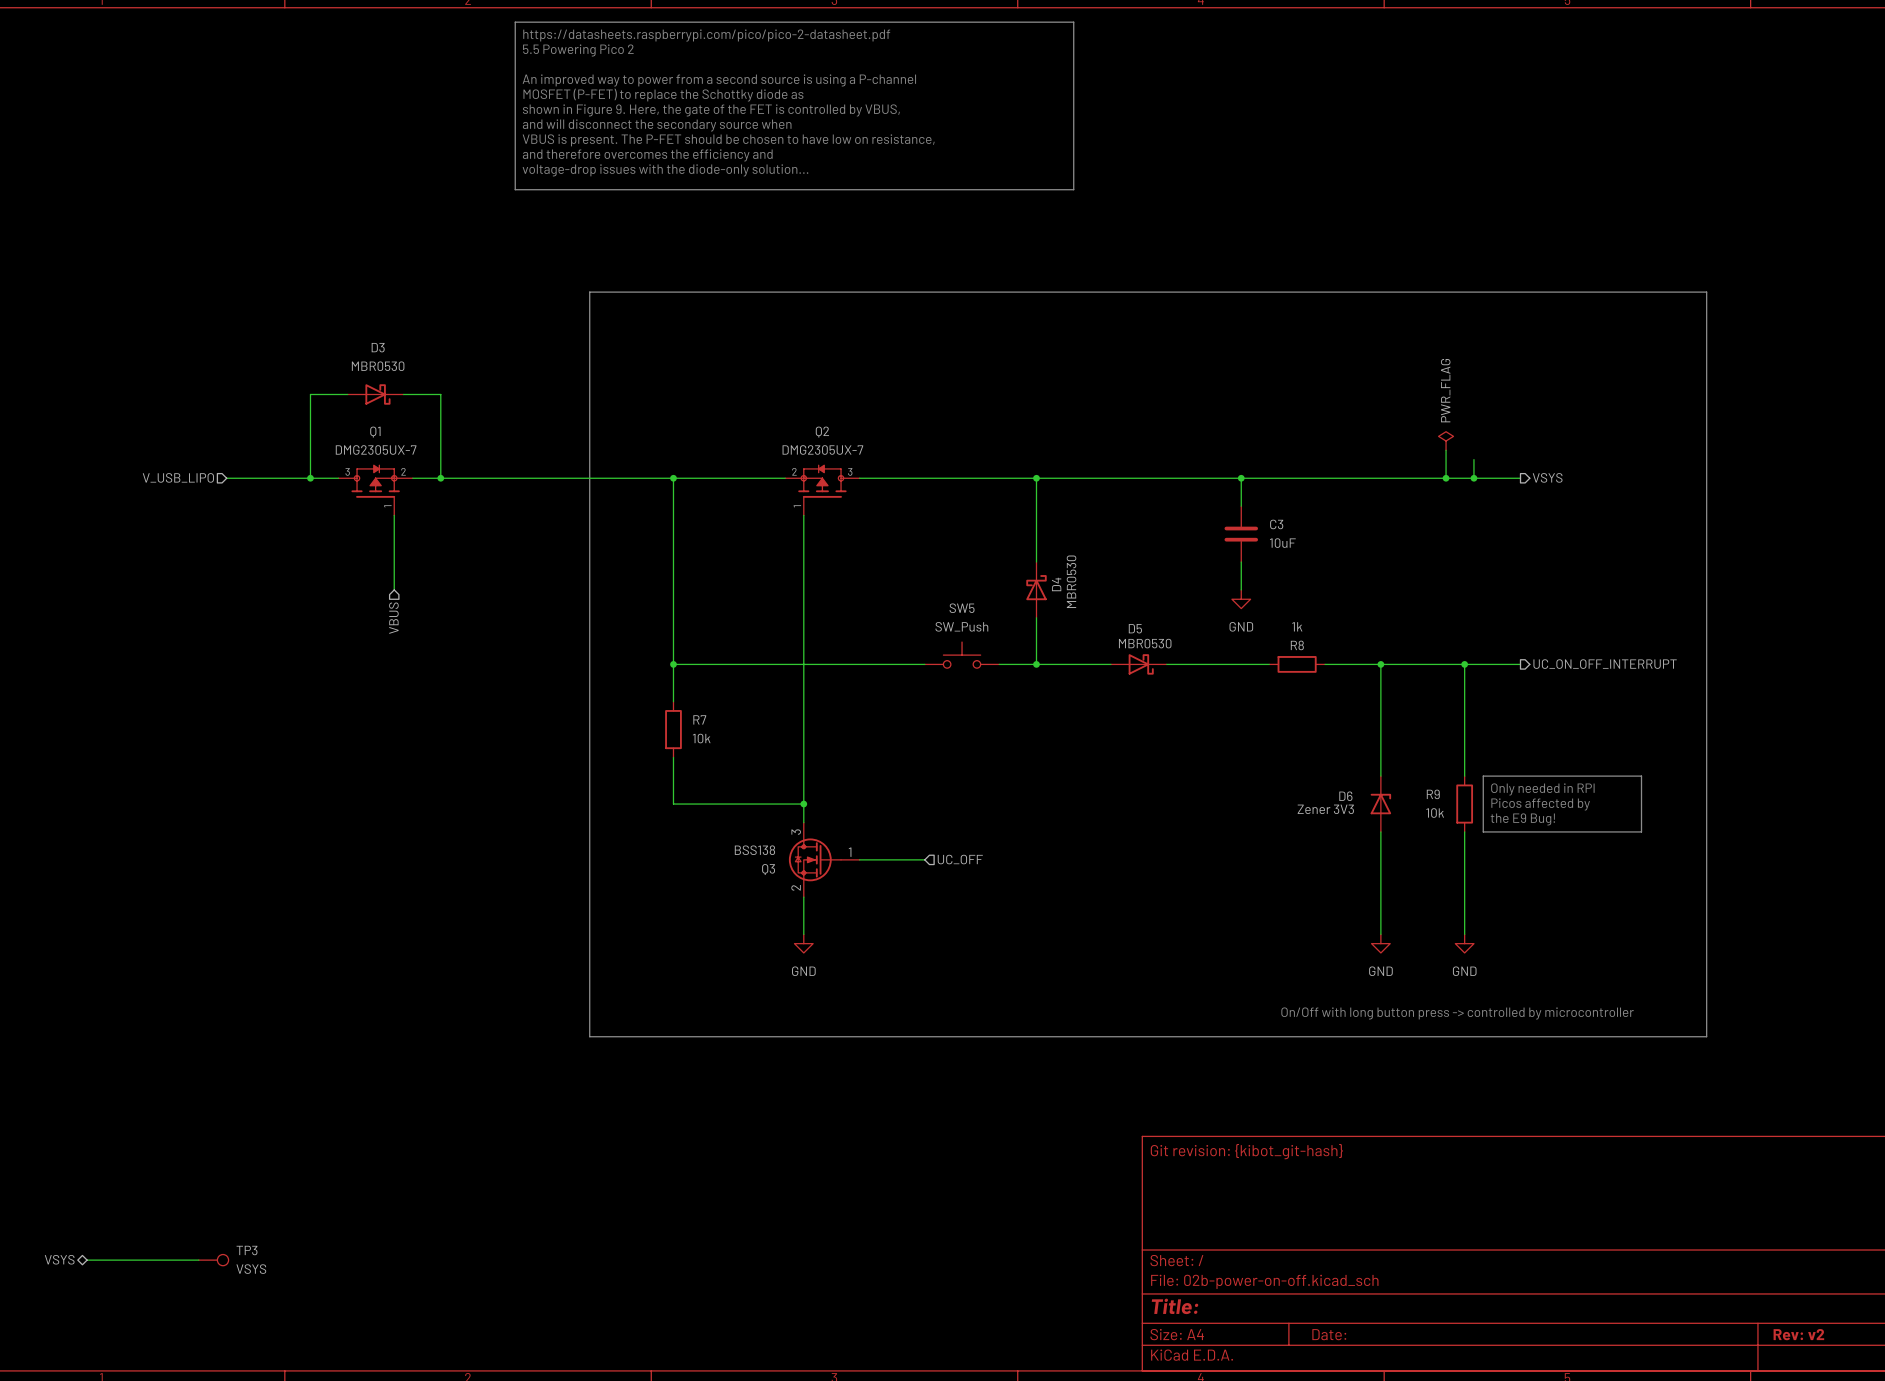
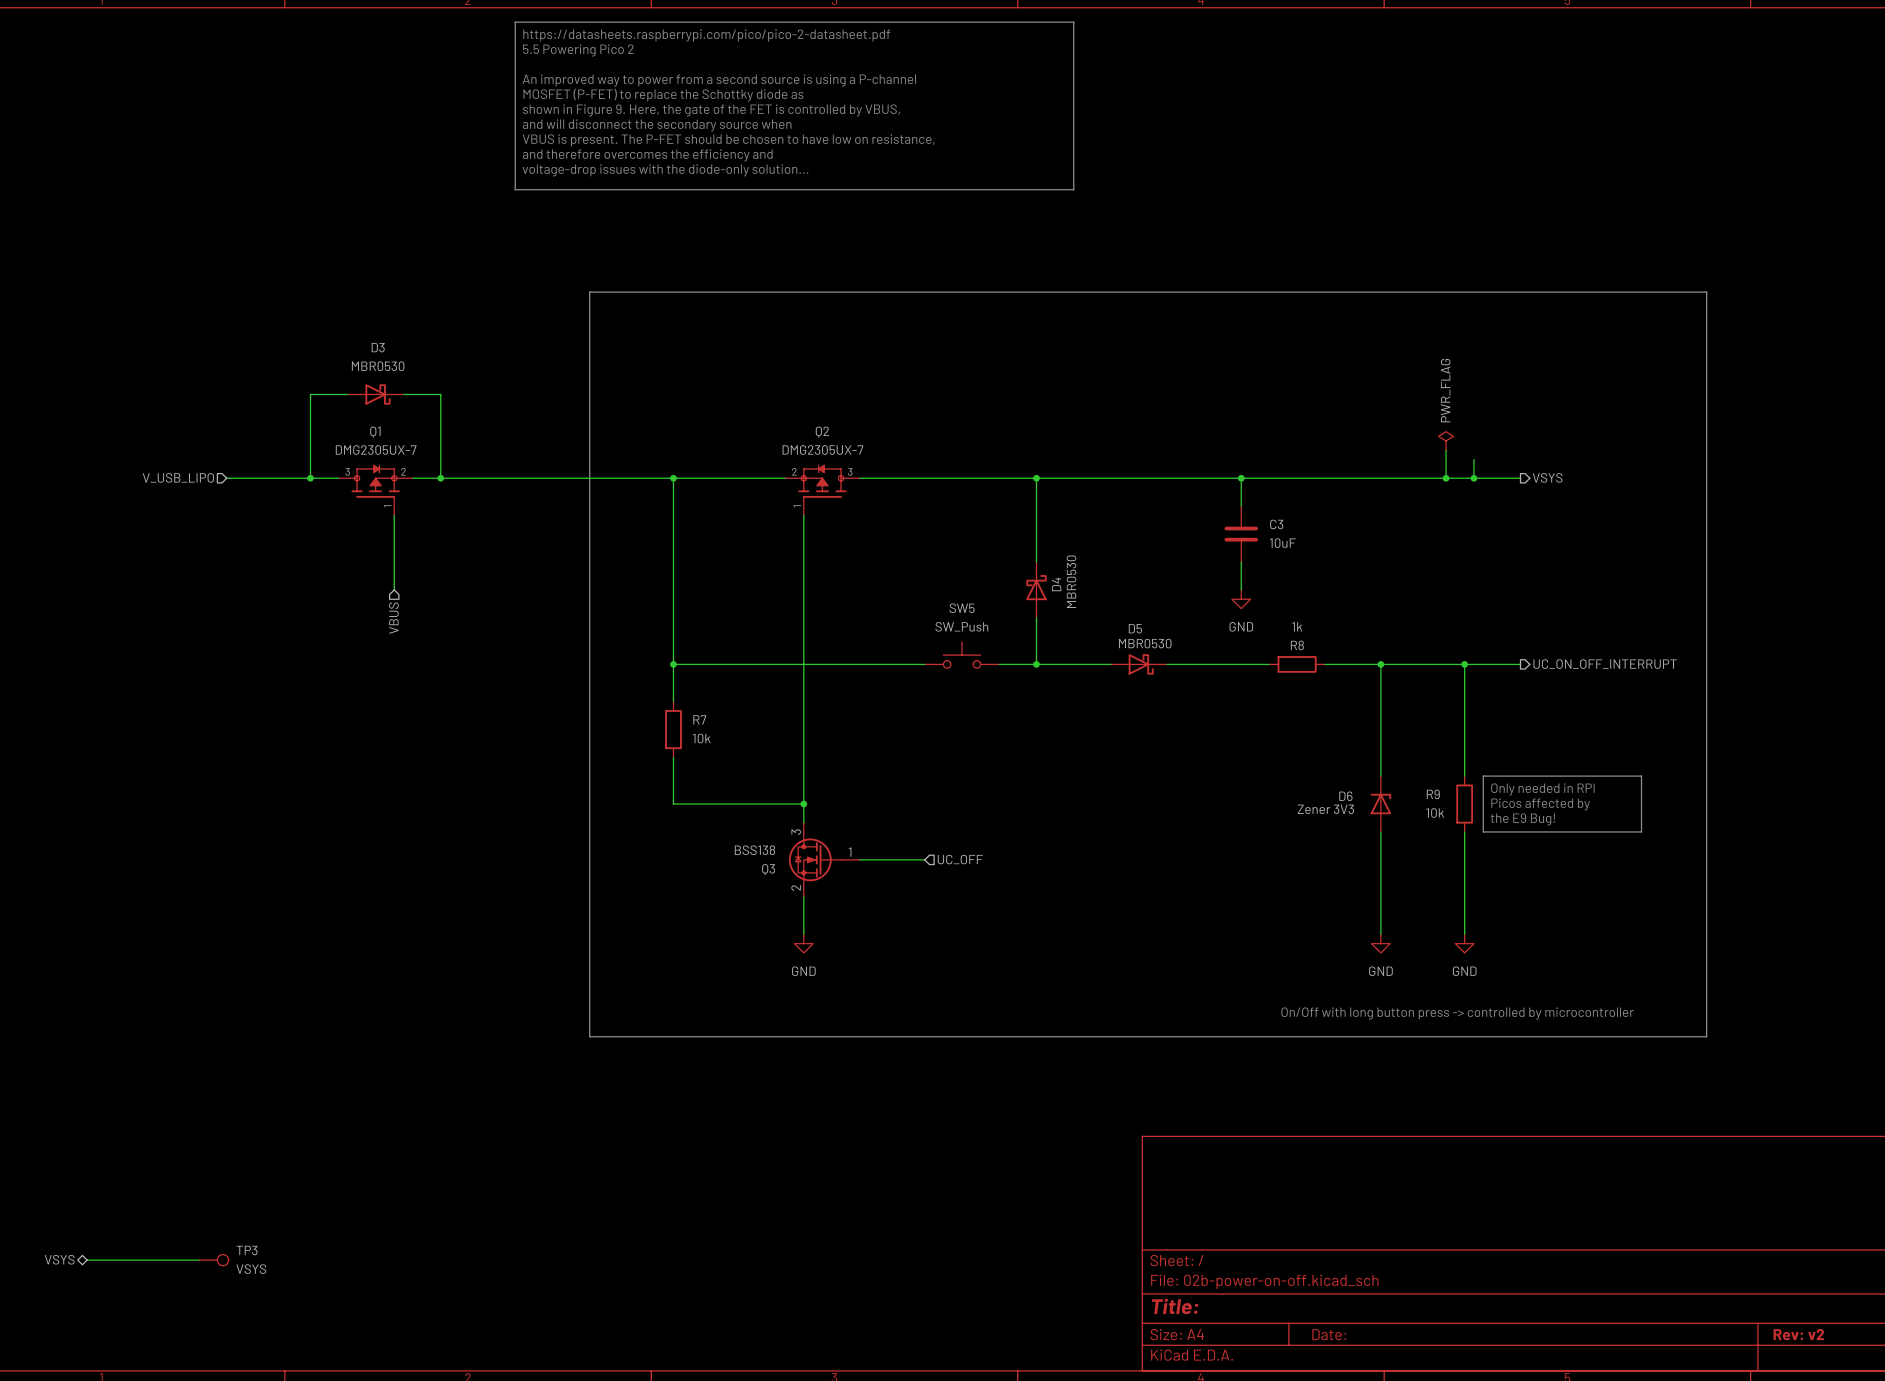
title block: Git revision: {kibot_git-hash} (1246, 1151) -> none

